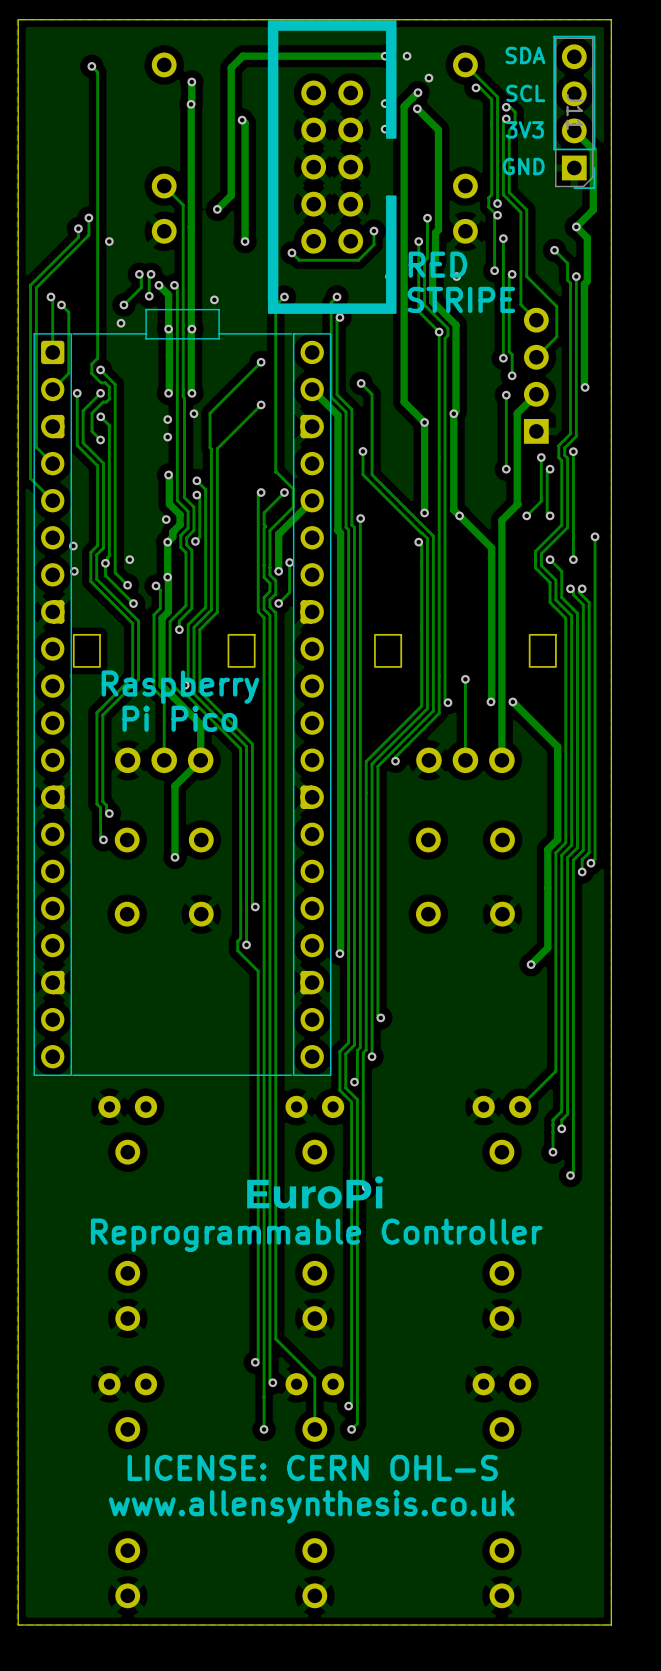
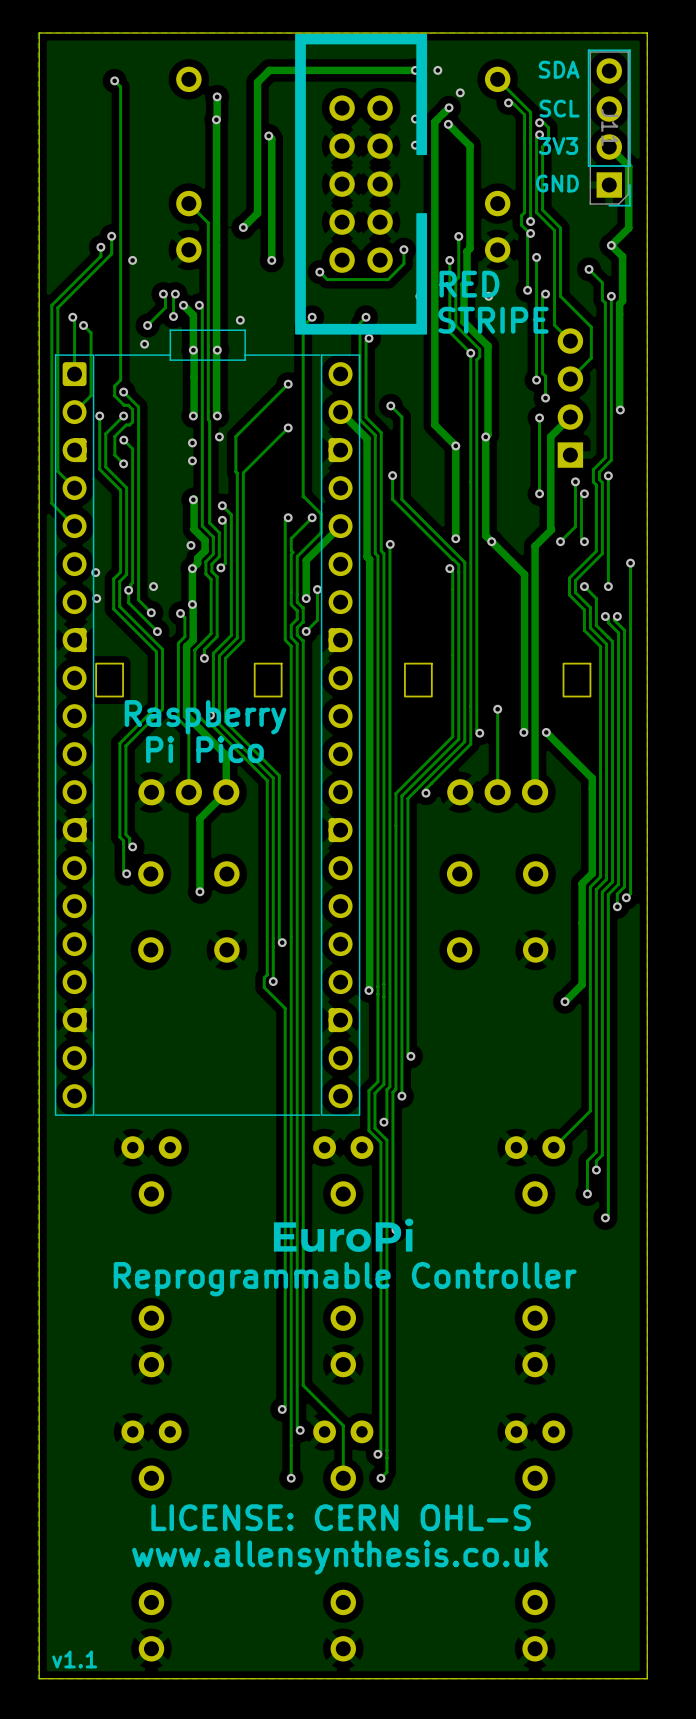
text: none -> v1.1 (74, 1659)

